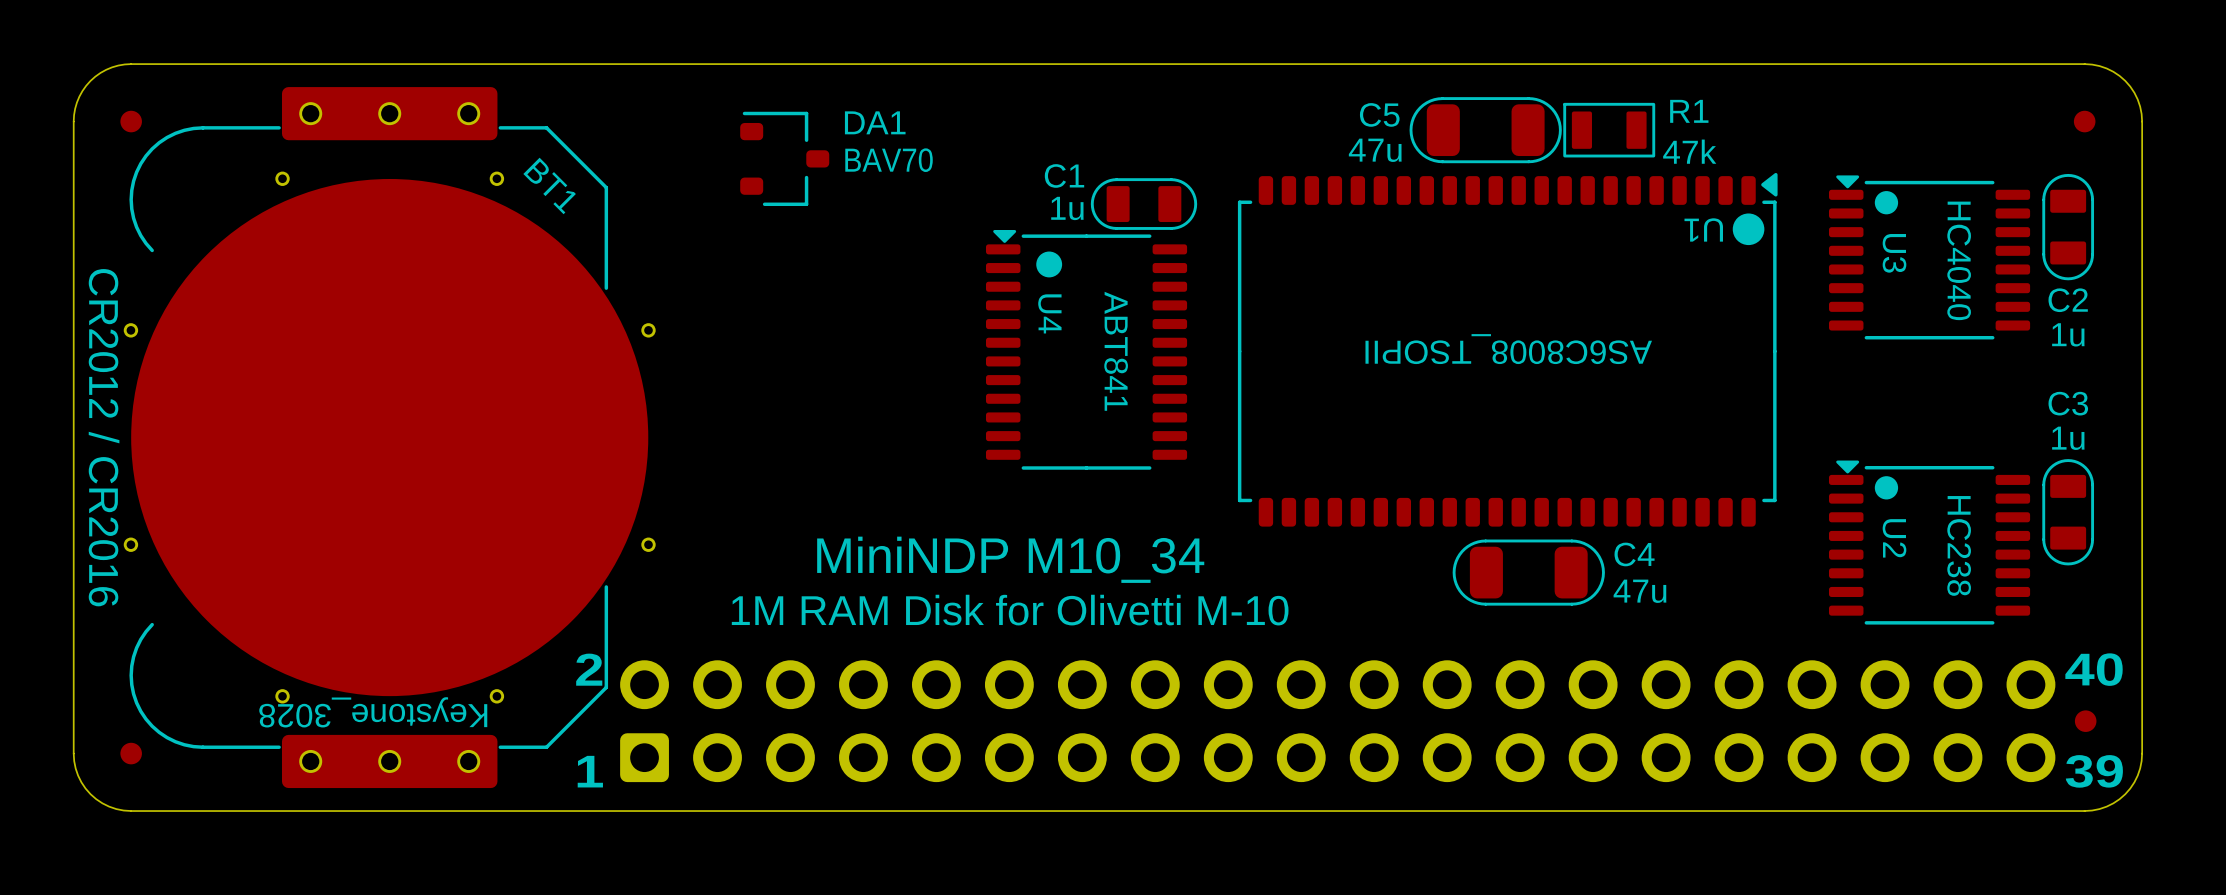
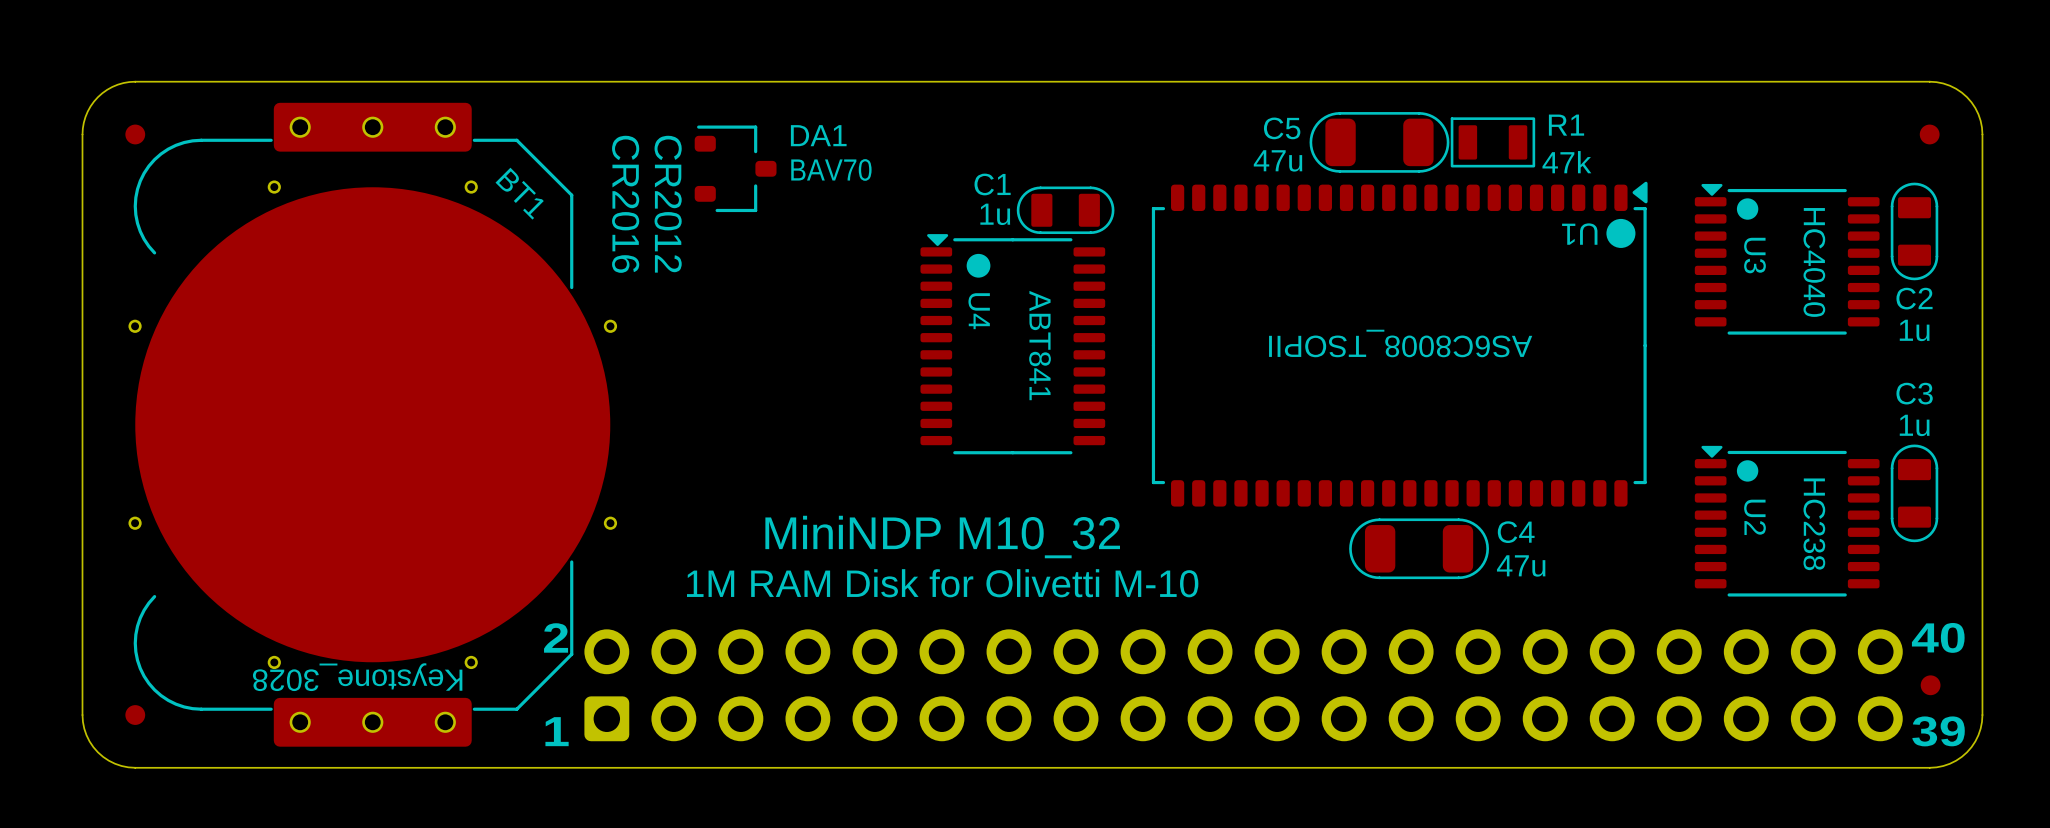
text: none -> CR2016 (625, 204)
text: none -> CR2012 (668, 204)
text: CR2012 / CR2016 (104, 437) -> none
text: MiniNDP M10_34 (1010, 559) -> MiniNDP M10_32 (942, 537)

